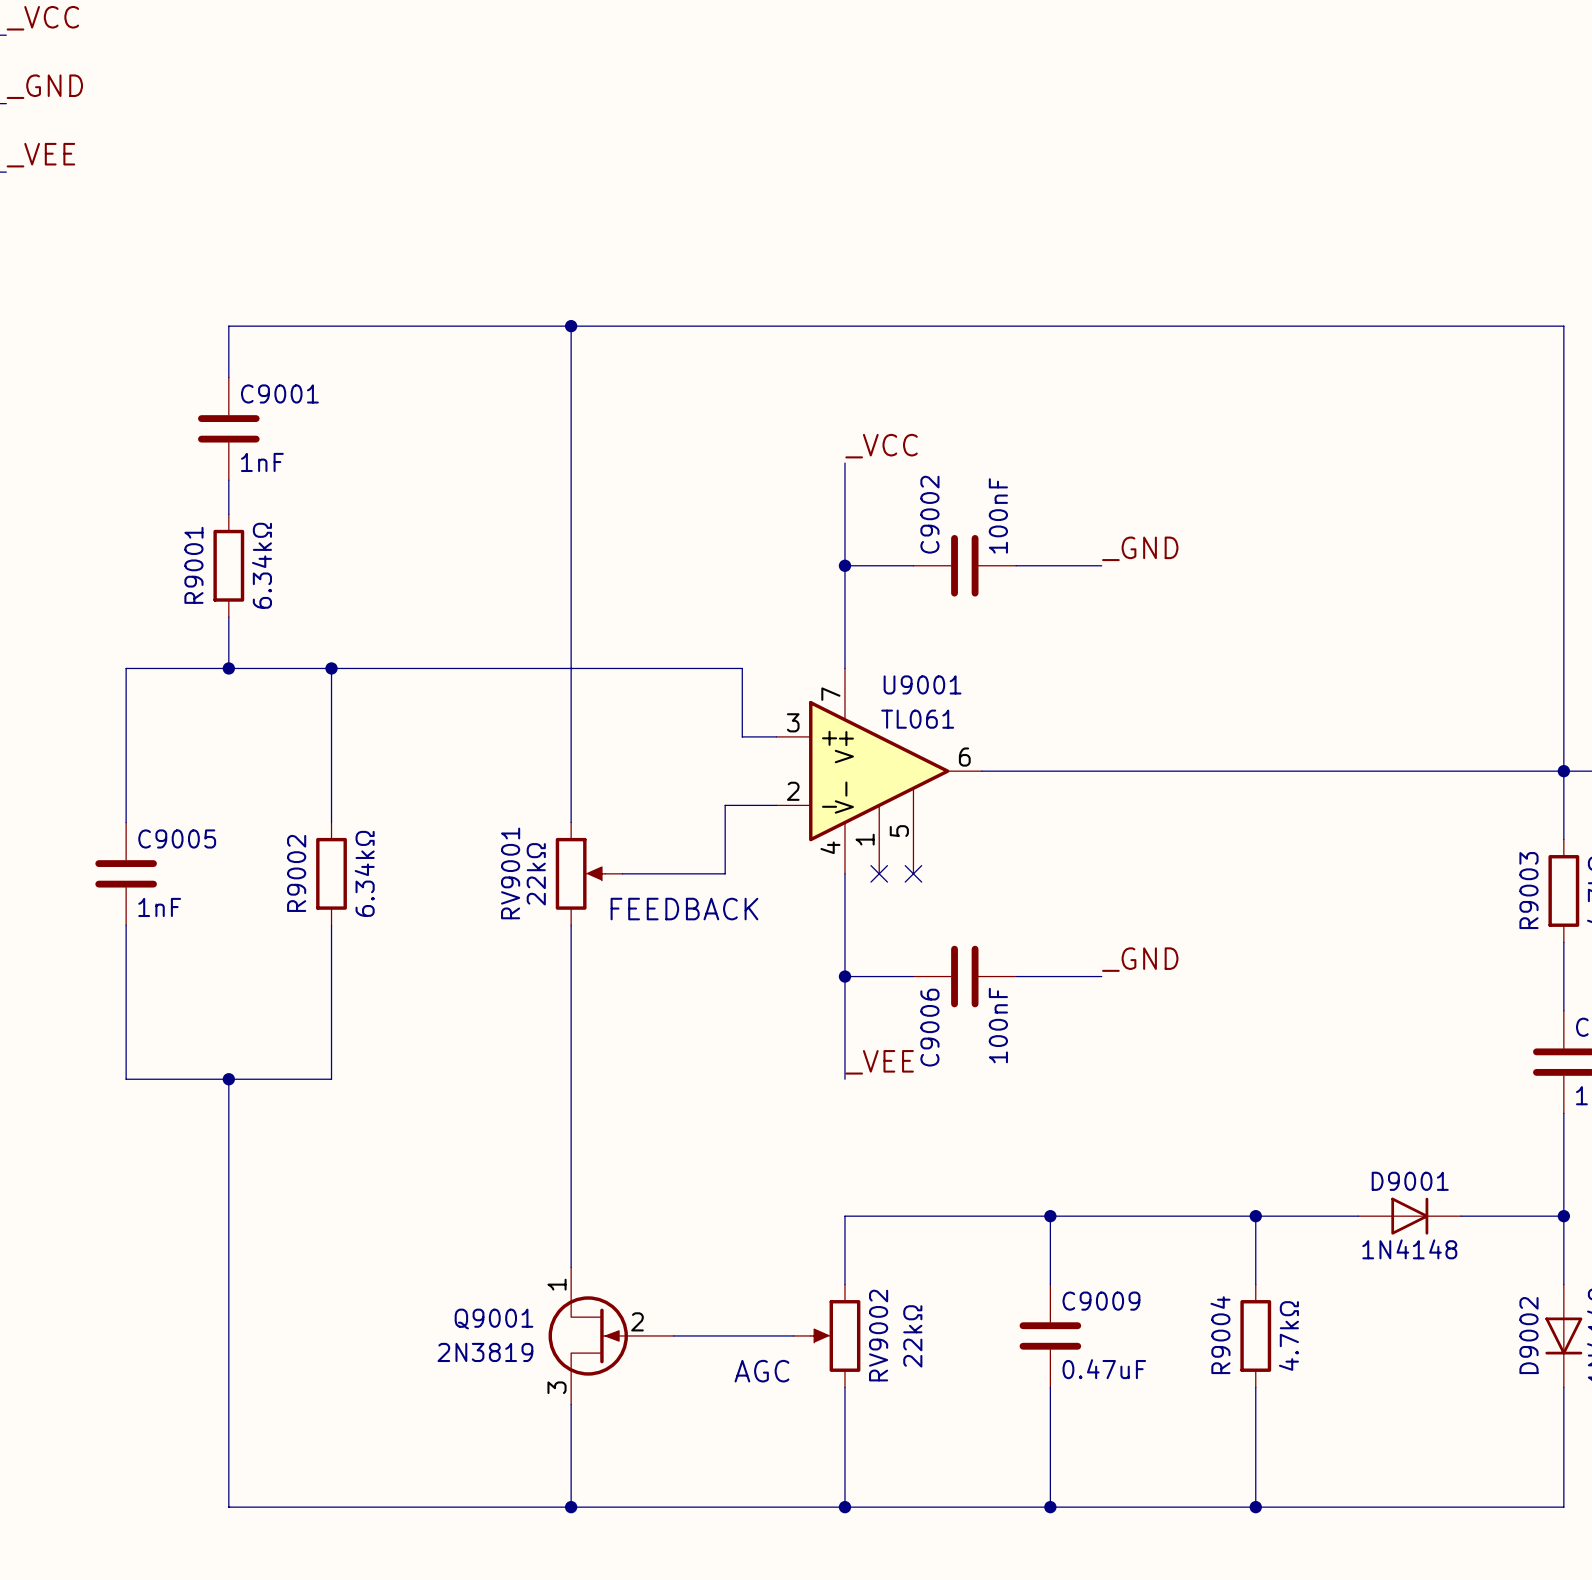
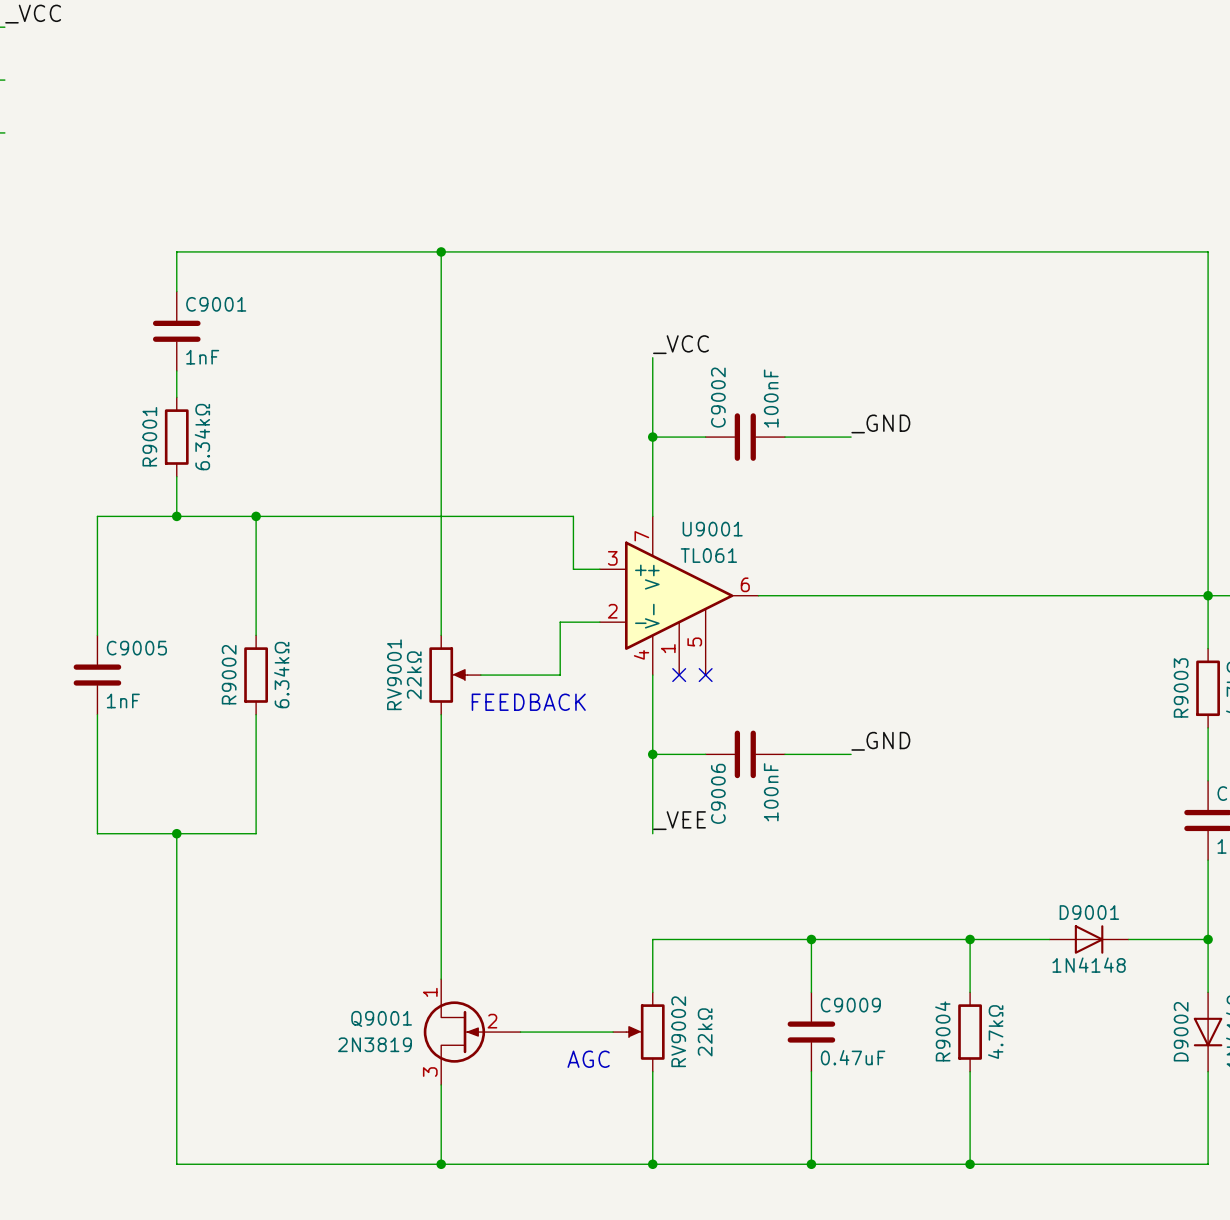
label: _GND (44, 86) -> none
label: _VEE (40, 155) -> none

